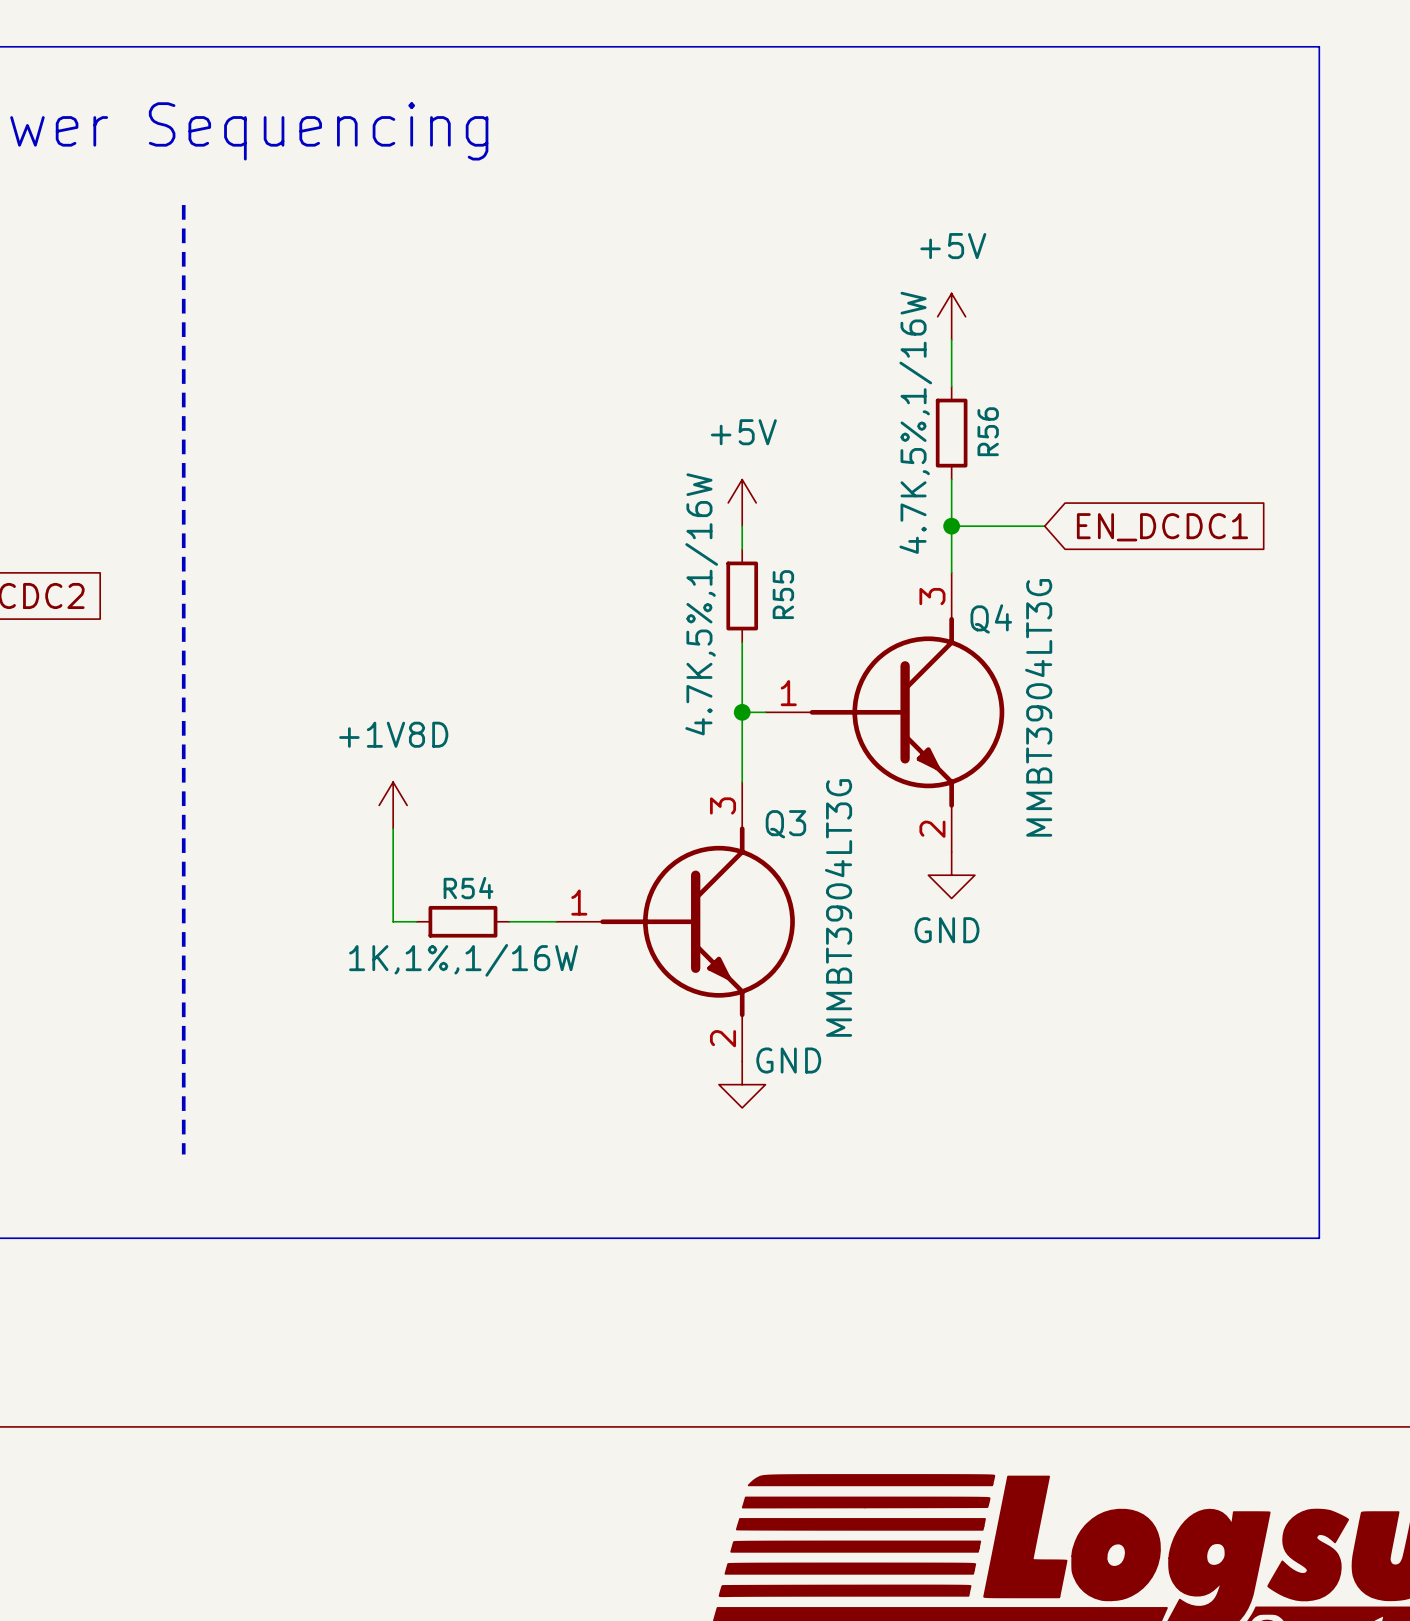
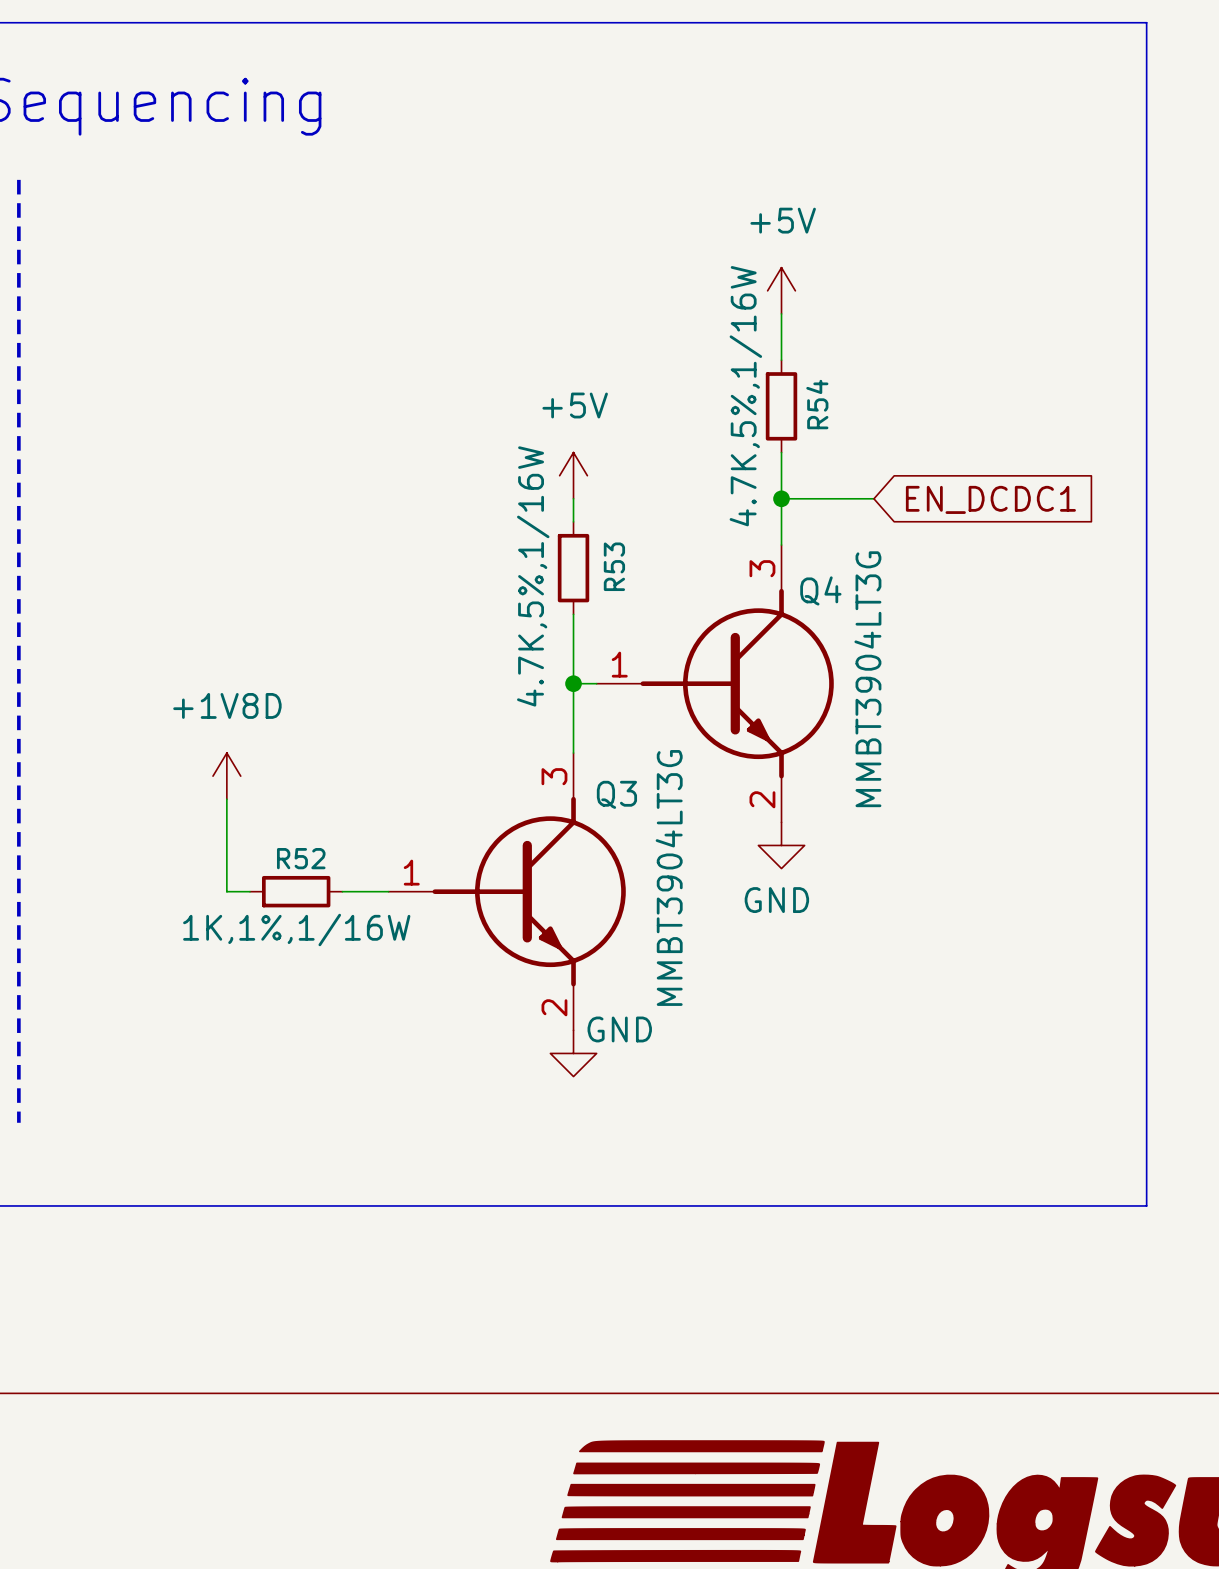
R56 name: R56 (988, 431) -> R54 (817, 404)
R55 name: R55 (783, 594) -> R53 (614, 566)
R54 name: R54 (468, 888) -> R52 (301, 858)

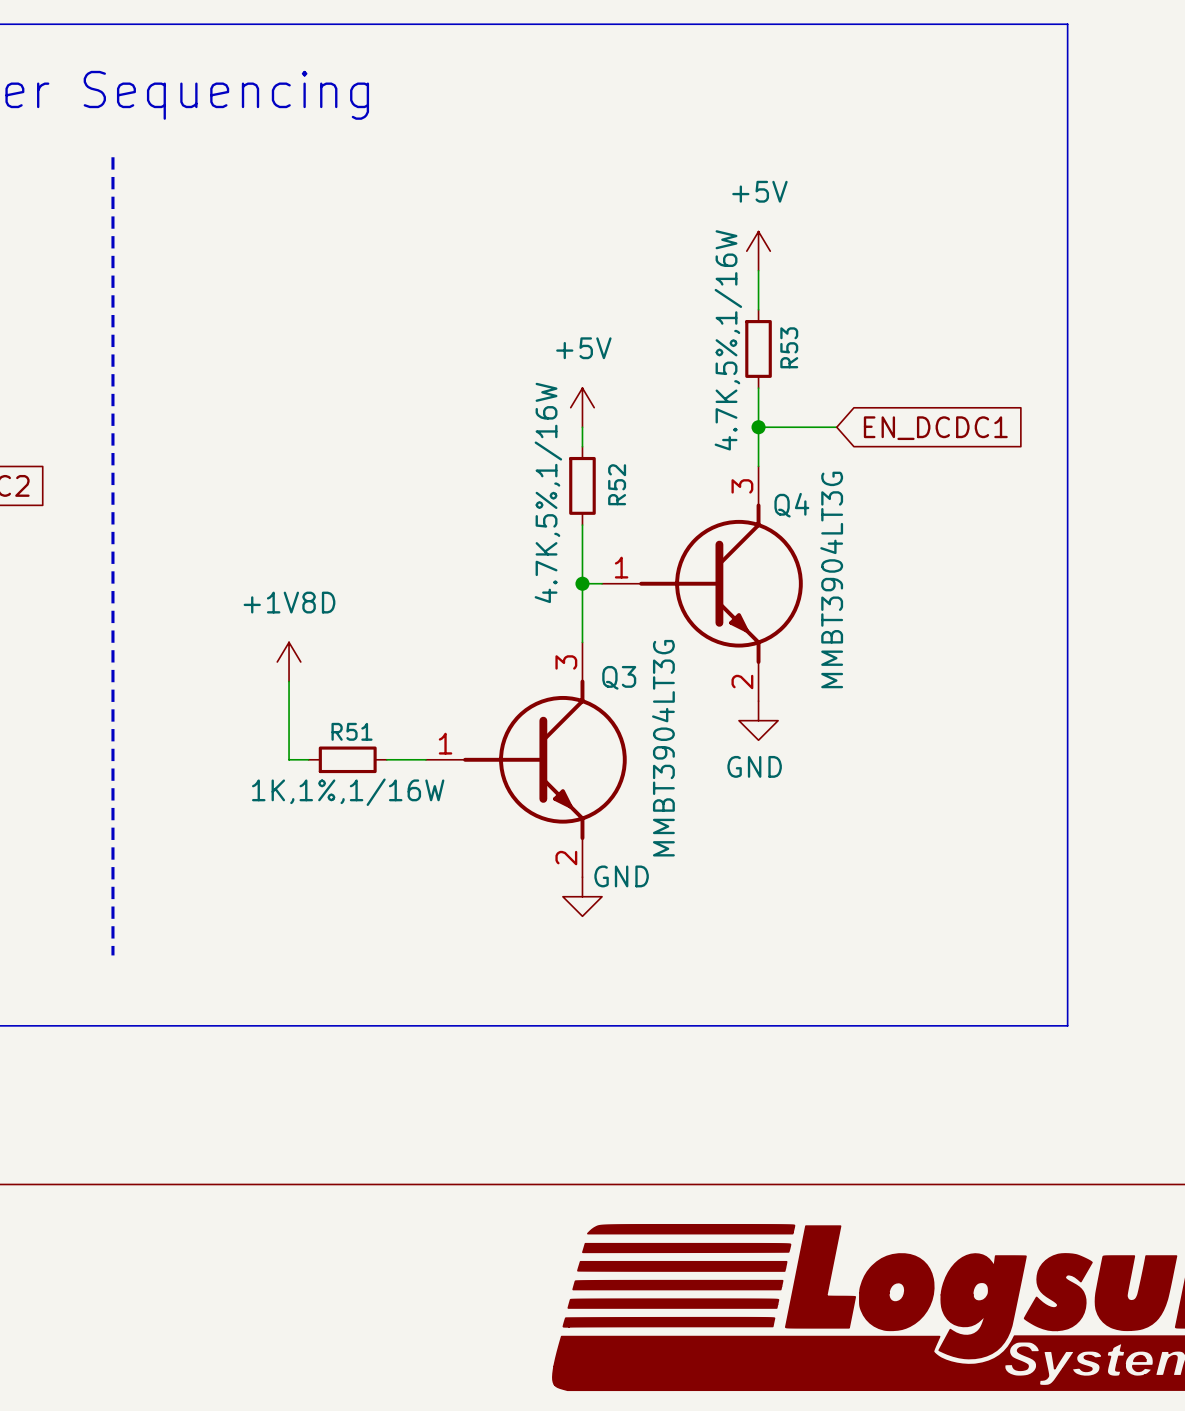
R54 name: R54 (817, 404) -> R53 (789, 347)
R53 name: R53 (614, 566) -> R52 (617, 484)
R52 name: R52 (301, 858) -> R51 (352, 731)

